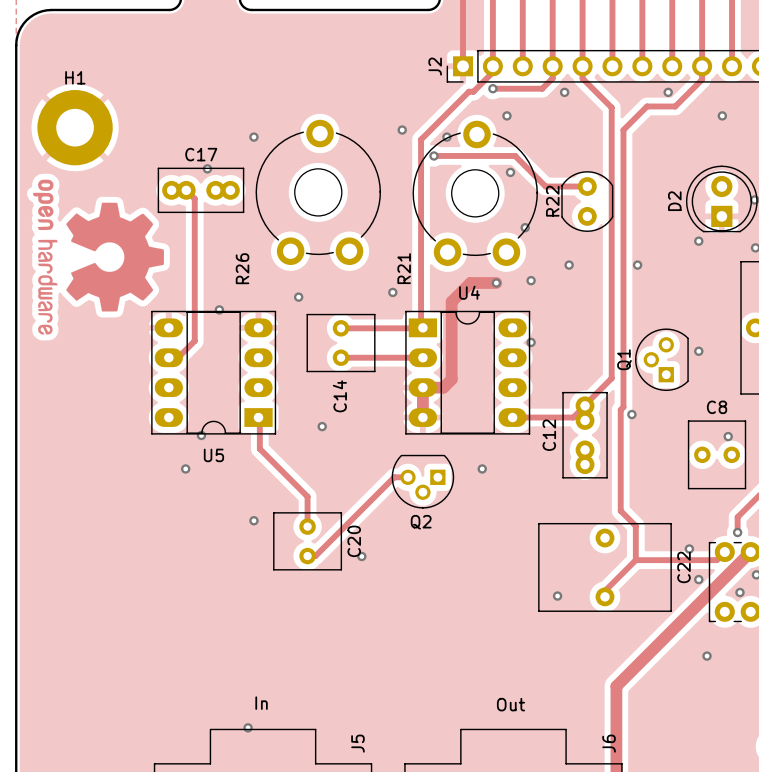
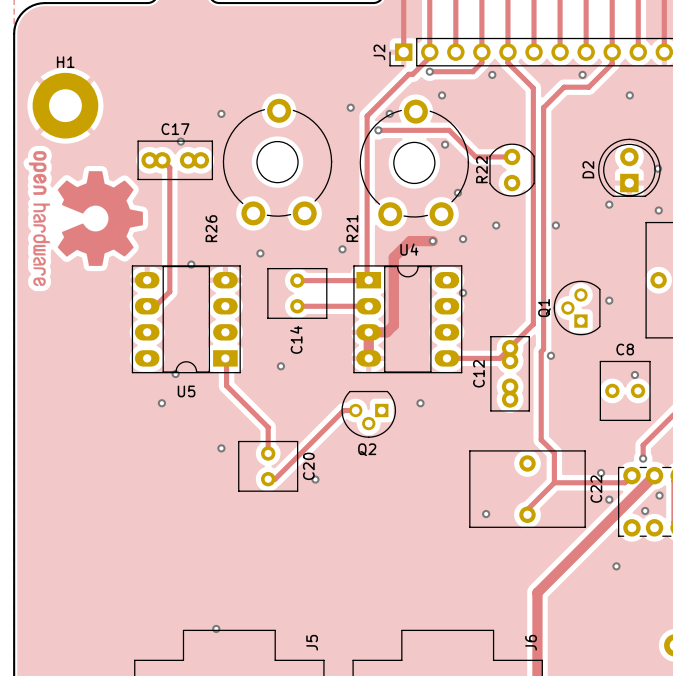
text: In (261, 703) -> none
text: Out (510, 704) -> none

